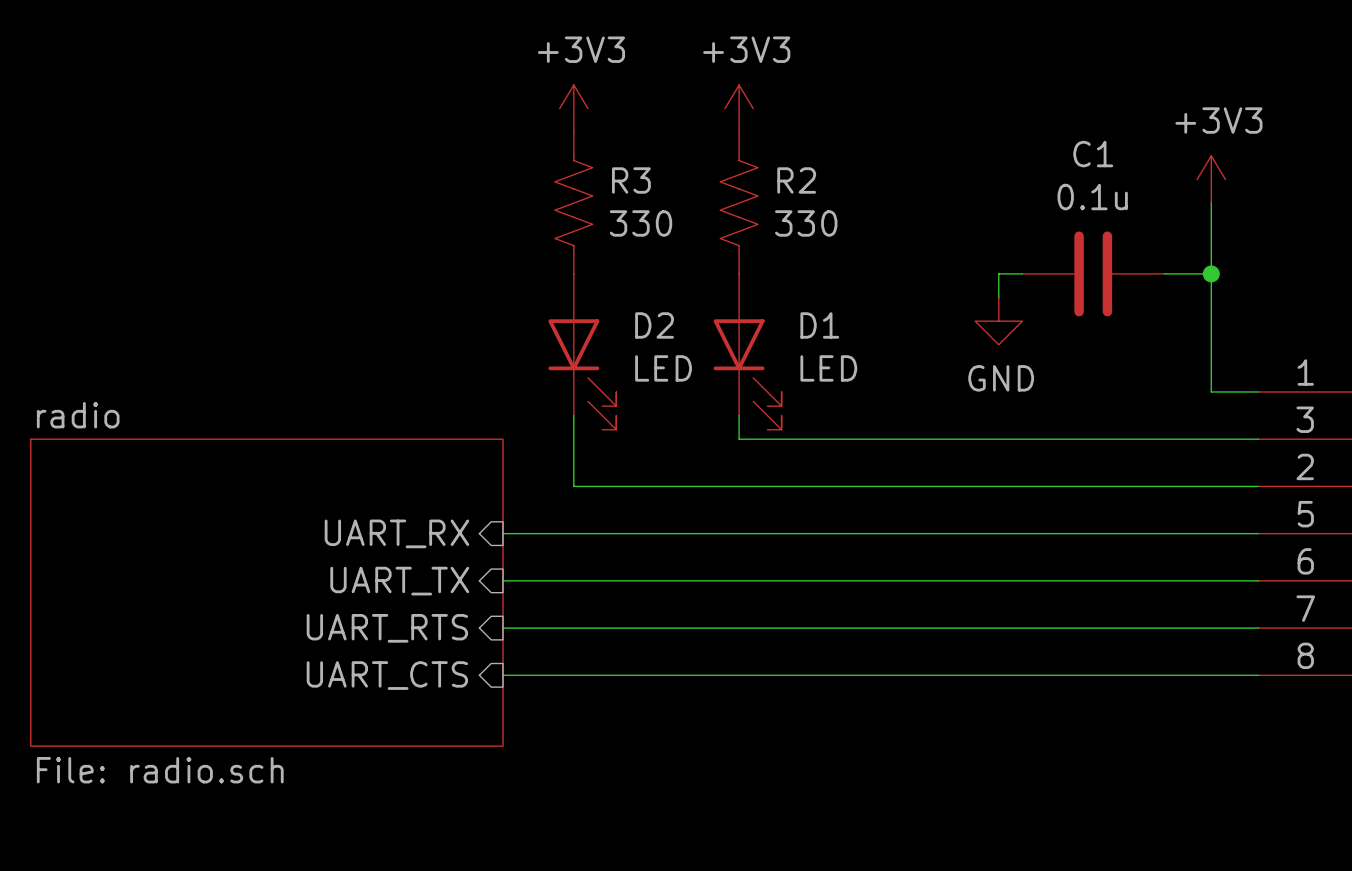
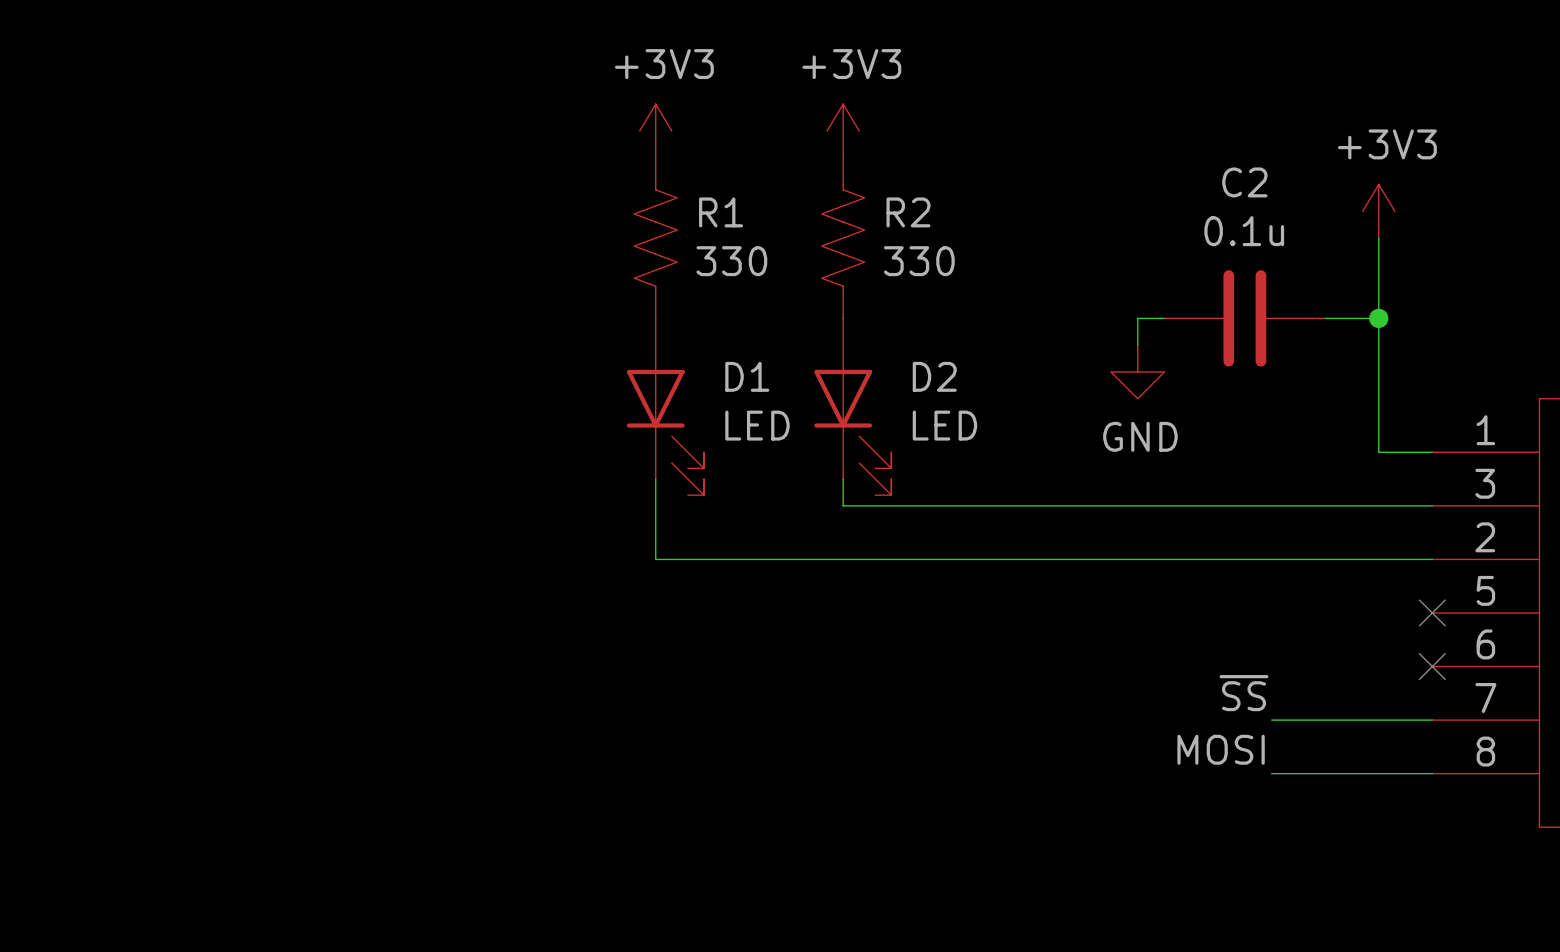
C1 name: C1 (1093, 154) -> C2 (1244, 182)
R3 name: R3 (631, 180) -> R1 (721, 212)
D2 name: D2 (654, 325) -> D1 (747, 376)
D1 name: D1 (819, 325) -> D2 (934, 376)
sheet pin: UART_RX (396, 533) -> none
wire: (502, 533) (1258, 533) -> none
no-connect mark: none -> (1432, 612)
wire: (502, 580) (1258, 580) -> none
no-connect mark: none -> (1432, 666)
sheet pin: UART_TX (399, 581) -> none
sheet radio: File: radio.sch (266, 592) -> none
label: none -> ~{SS} (1244, 693)
sheet pin: UART_RTS (387, 628) -> none
wire: (502, 628) (1116, 628) -> none
label: none -> MOSI (1221, 749)
sheet pin: UART_CTS (387, 675) -> none
wire: (502, 675) (1116, 675) -> none

